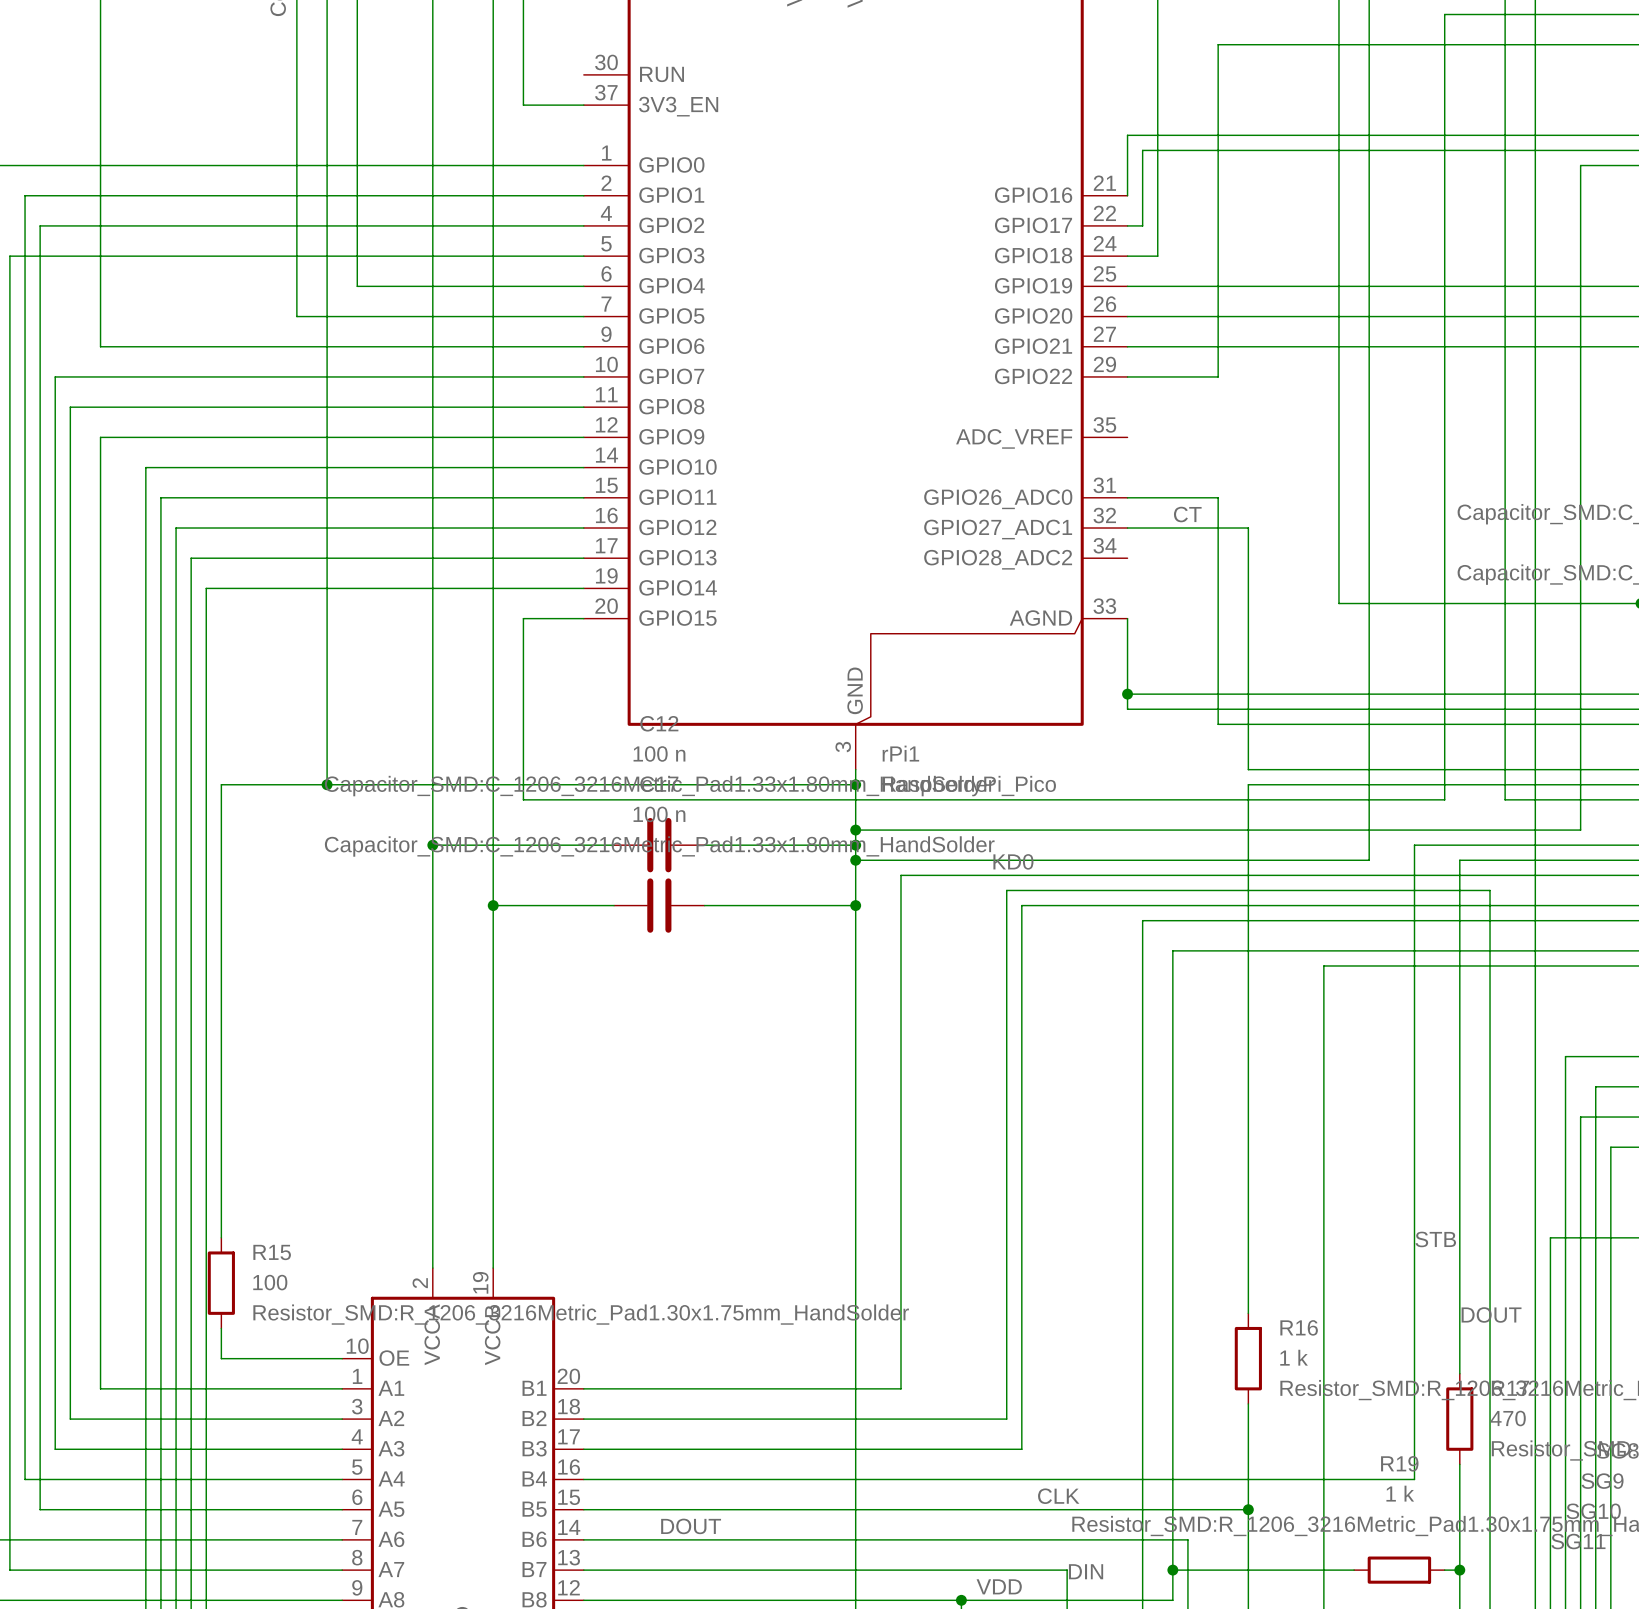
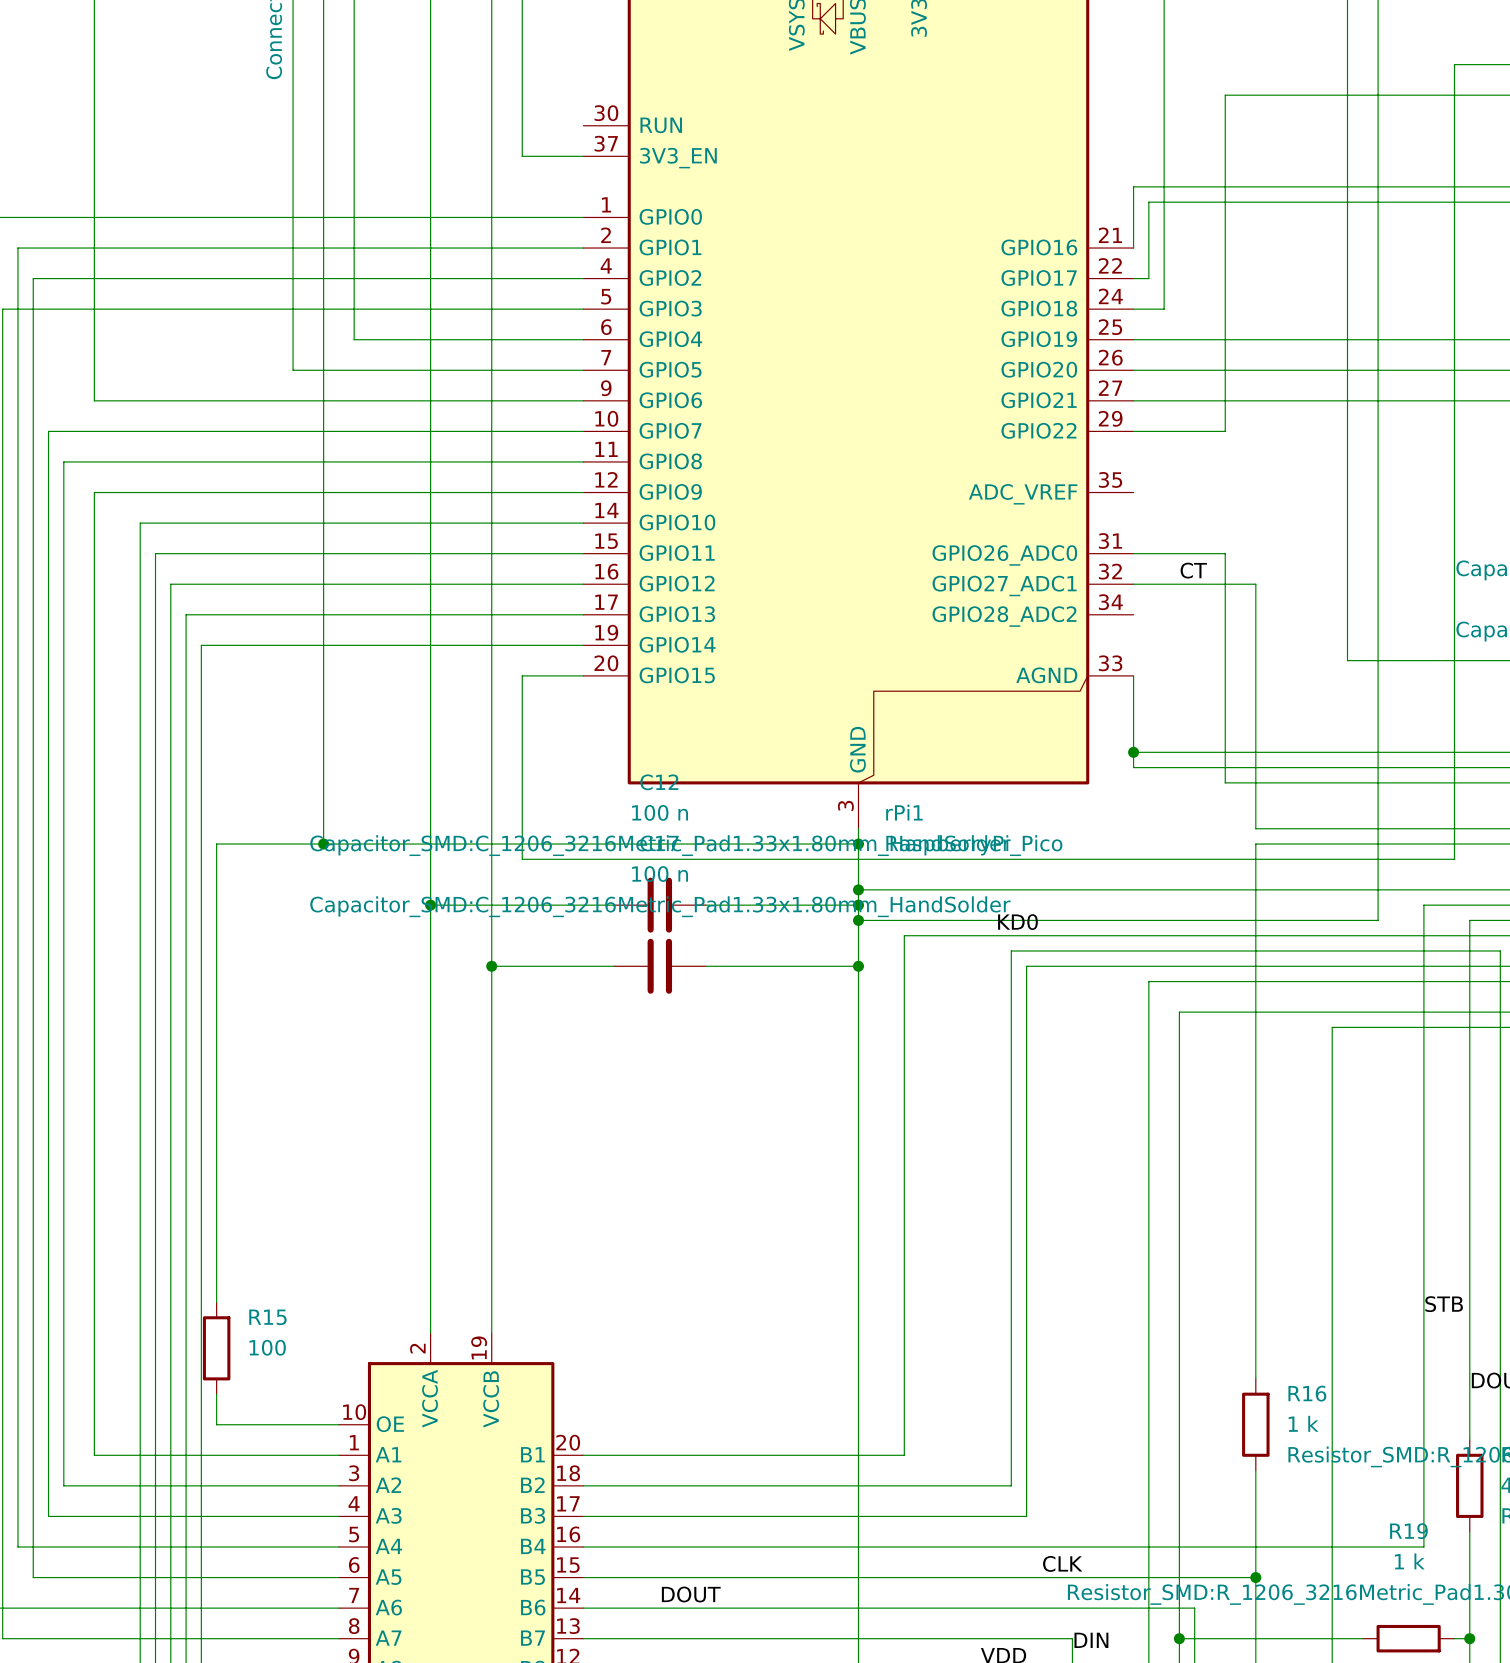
R15 text: Resistor_SMD:R_1206_3216Metric_Pad1.30x1.75mm_HandSolder (581, 1314) -> none

